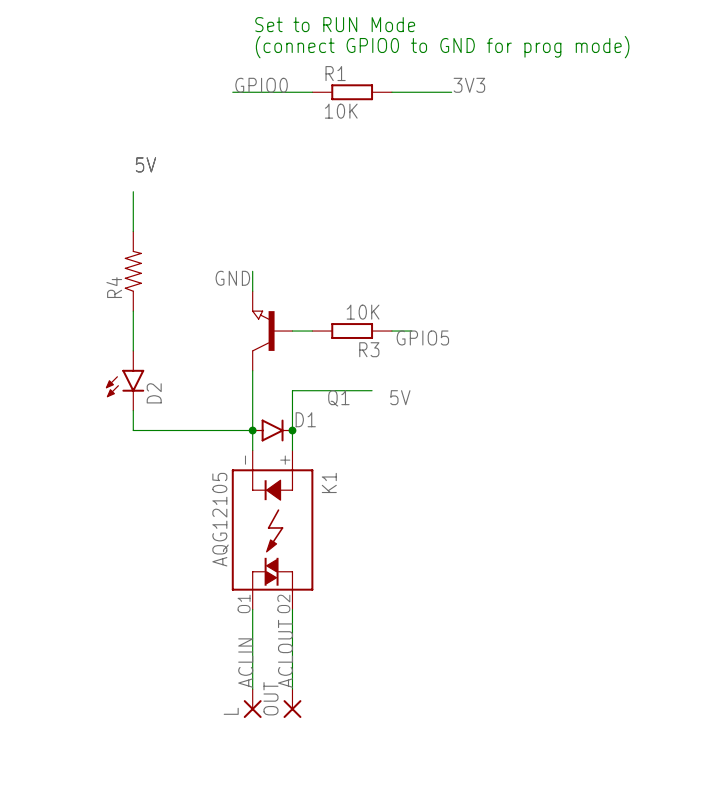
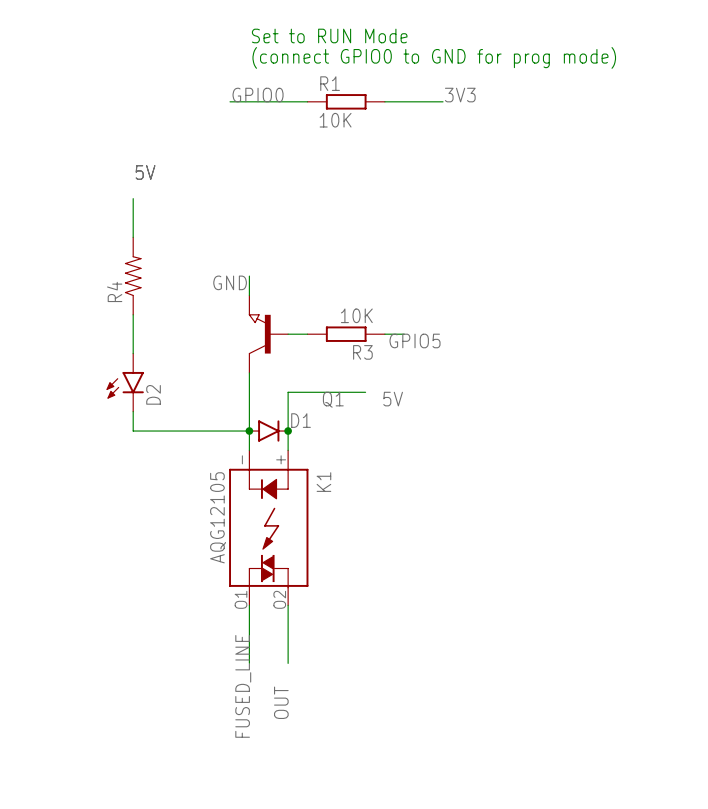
label: ACLOUT (285, 653) -> OUT (281, 702)
label: ACLIN (245, 663) -> none
wire: (252, 669) (252, 689) -> none
wire: (292, 669) (292, 689) -> none
label: none -> FUSED_LINE (243, 686)
L: (252, 703) -> none
OUT: (292, 703) -> none

